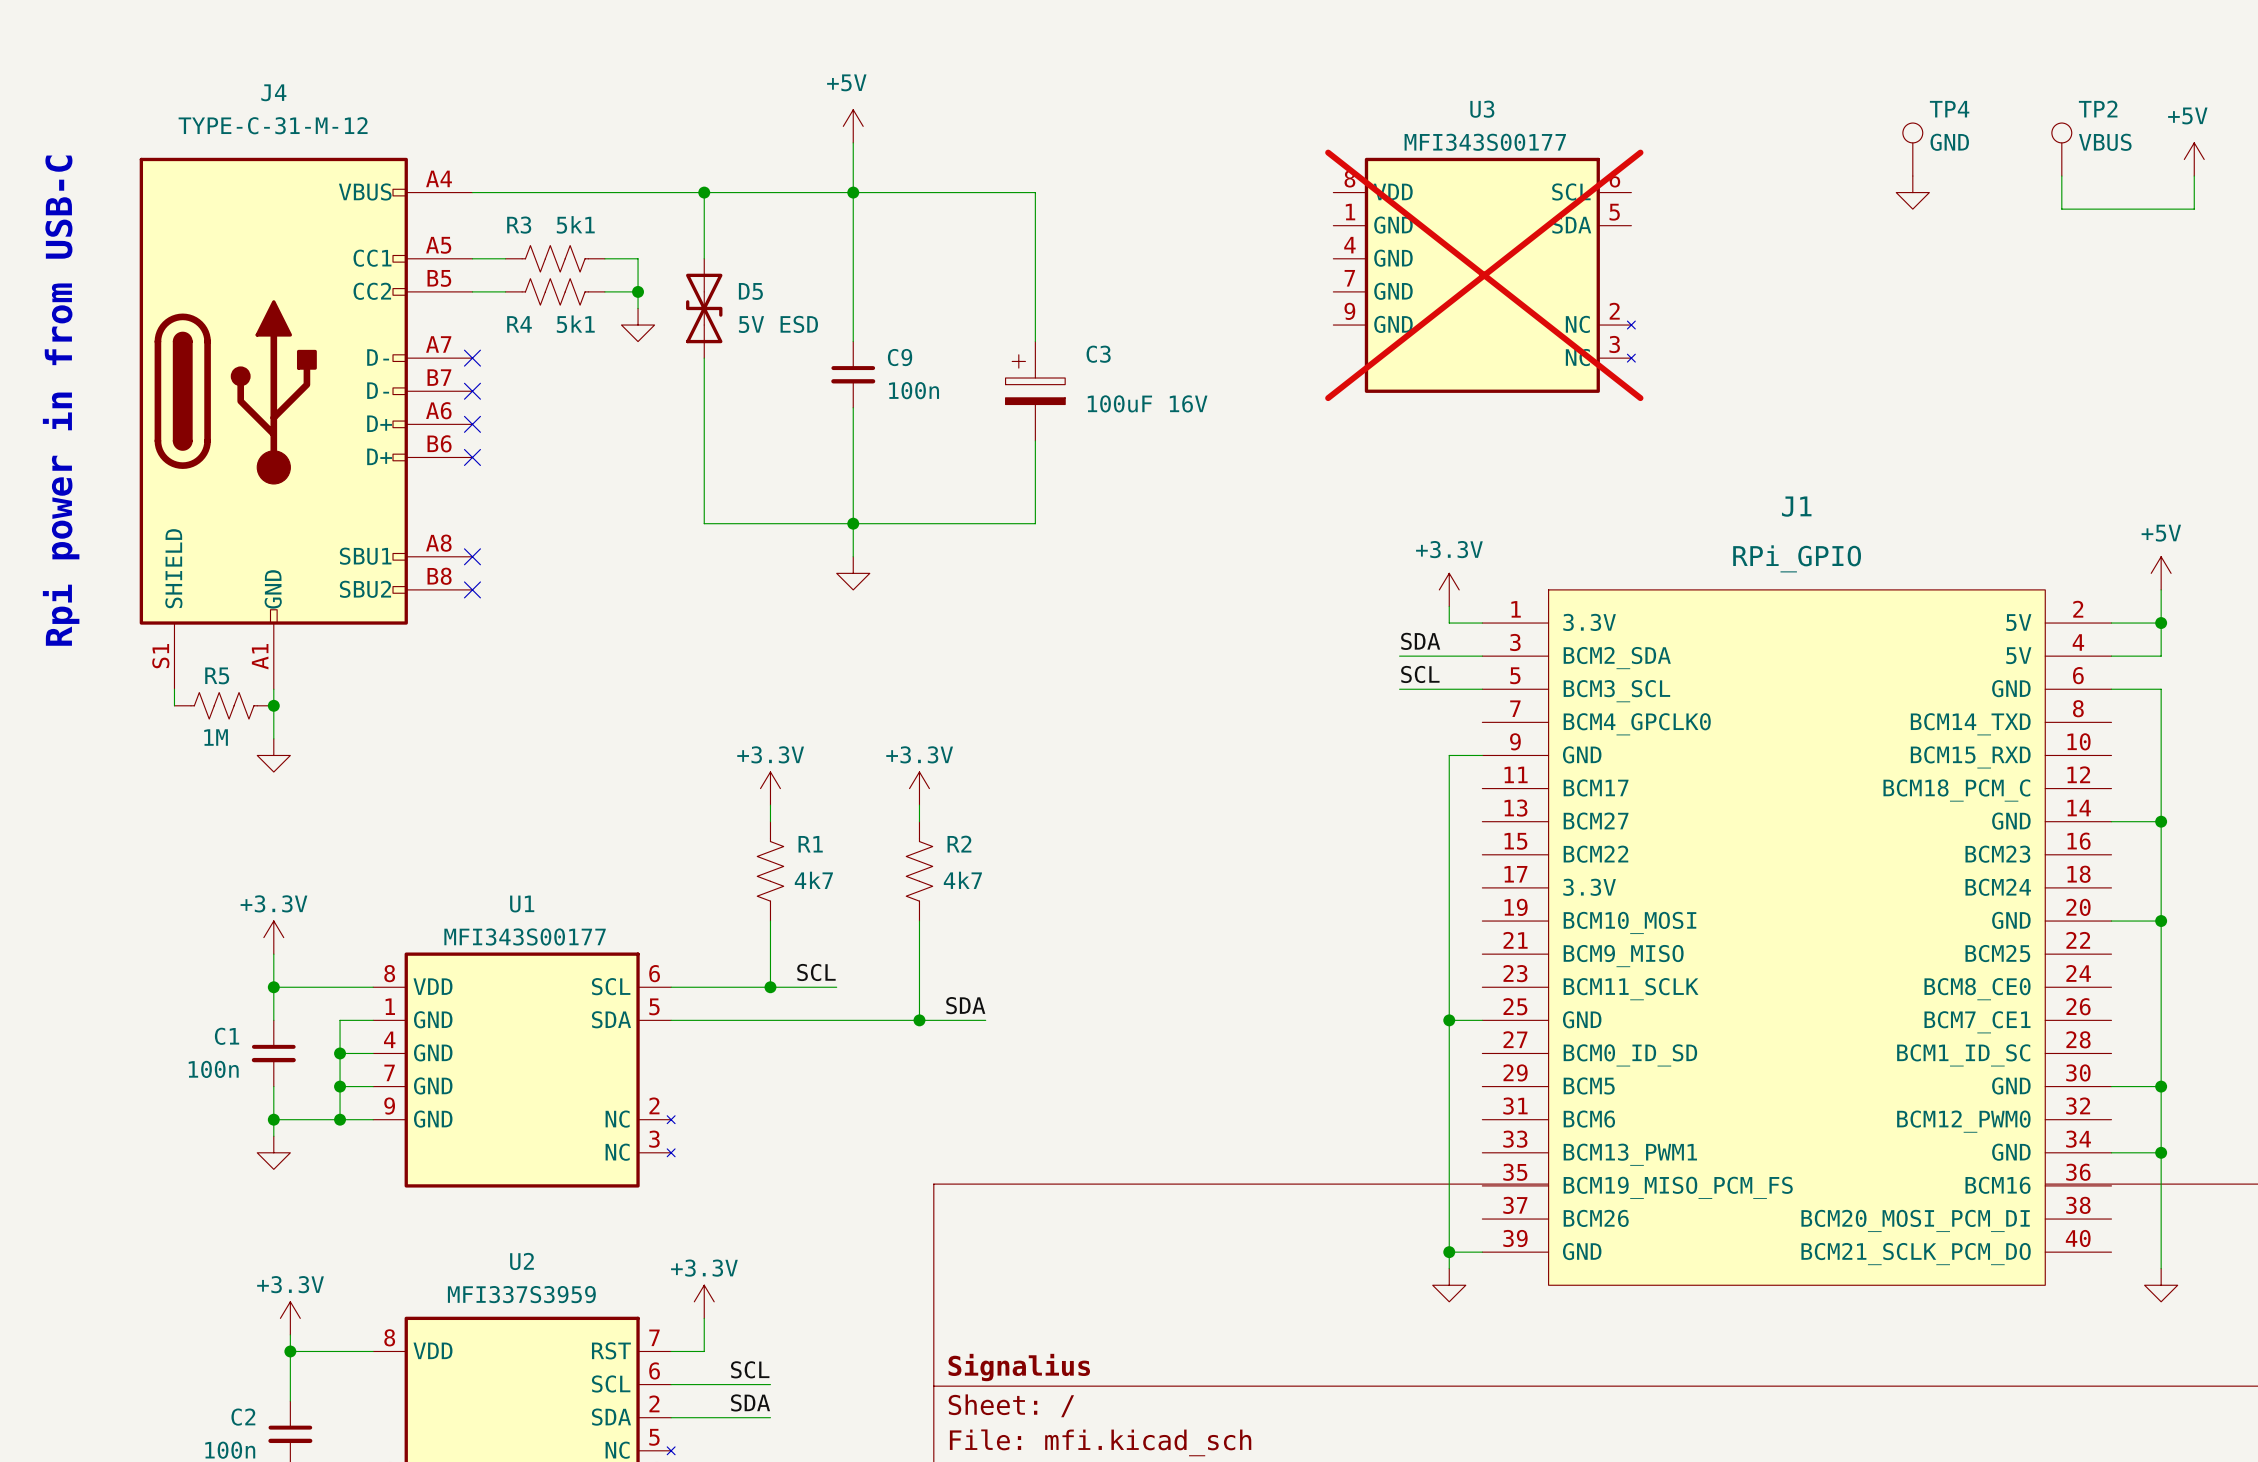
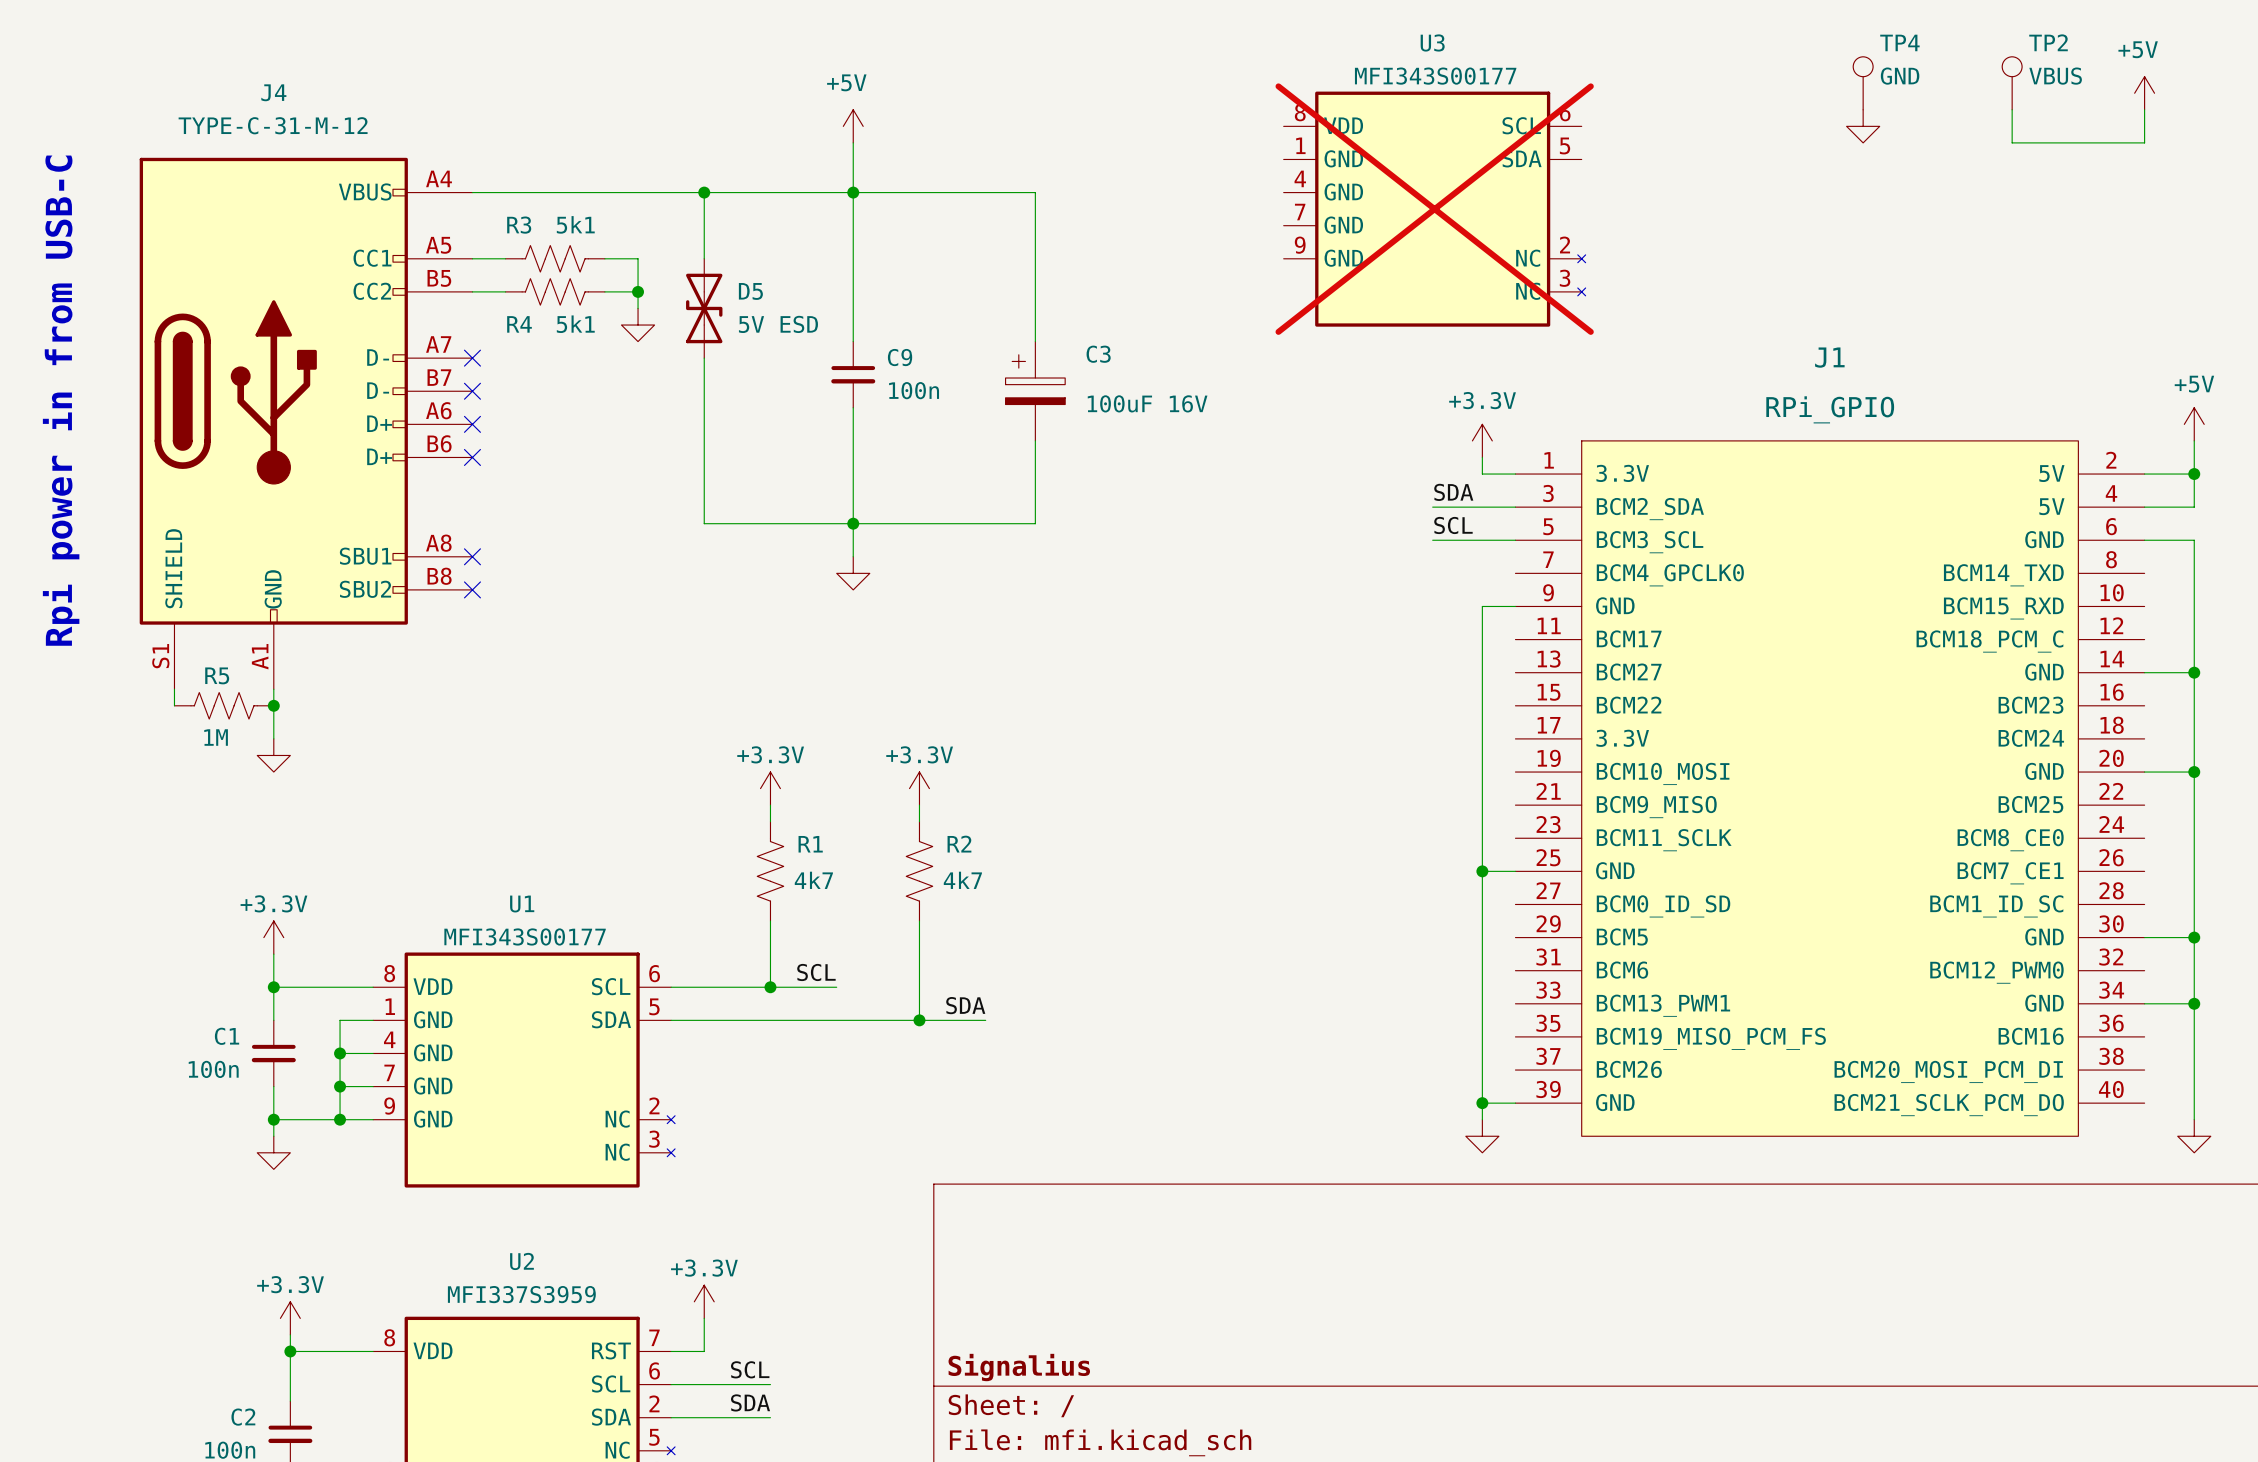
TP4 position: (1912, 149) -> (1863, 83)
TP2 position: (2061, 149) -> (2012, 83)
power symbol position: +5V (2194, 159) -> +5V (2144, 93)
wire: (2061, 176) (2061, 209) (2194, 209) (2194, 176) -> (2012, 109) (2012, 142) (2144, 142) (2144, 109)
power symbol position: (1912, 192) -> (1863, 126)
U3 position: (1484, 275) -> (1434, 209)
power symbol: none -> +5V (2194, 424)
junction: none -> (2194, 474)
power symbol: +5V (2161, 573) -> none
power symbol position: +3.3V (1449, 589) -> +3.3V (1482, 440)
wire: (2161, 589) (2161, 656) (2111, 656) -> (2194, 440) (2194, 507) (2144, 507)
wire: (1449, 606) (1449, 623) (1482, 623) -> (1482, 457) (1482, 474) (1515, 474)
wire: (2111, 623) (2161, 623) -> (2144, 474) (2194, 474)
junction position: (2161, 623) -> (2194, 672)
label position: SDA (1420, 641) -> SDA (1453, 492)
wire: (1399, 656) (1482, 656) -> (1432, 507) (1515, 507)
label position: SCL (1420, 674) -> SCL (1453, 525)
wire: (1399, 689) (1482, 689) -> (1432, 540) (1515, 540)
wire: (2111, 689) (2161, 689) (2161, 1268) -> (2144, 540) (2194, 540) (2194, 1119)
wire: (1482, 755) (1449, 755) (1449, 1268) -> (1515, 606) (1482, 606) (1482, 1119)
wire: (2111, 821) (2161, 821) -> (2144, 672) (2194, 672)
junction position: (2161, 821) -> (2194, 772)
junction: none -> (1482, 871)
wire: (2111, 921) (2161, 921) -> (2144, 772) (2194, 772)
junction position: (2161, 921) -> (2194, 937)
J1 position: (1796, 937) -> (1830, 788)
junction: none -> (2194, 1003)
wire: (1449, 1020) (1482, 1020) -> (1482, 871) (1515, 871)
junction: (1449, 1020) -> none
wire: (2111, 1086) (2161, 1086) -> (2144, 937) (2194, 937)
junction: (2161, 1086) -> none
junction: none -> (1482, 1103)
wire: (2111, 1152) (2161, 1152) -> (2144, 1003) (2194, 1003)
junction: (2161, 1152) -> none
wire: (1449, 1252) (1482, 1252) -> (1482, 1103) (1515, 1103)
junction: (1449, 1252) -> none
power symbol position: (1449, 1285) -> (1482, 1136)
power symbol position: (2161, 1285) -> (2194, 1136)

